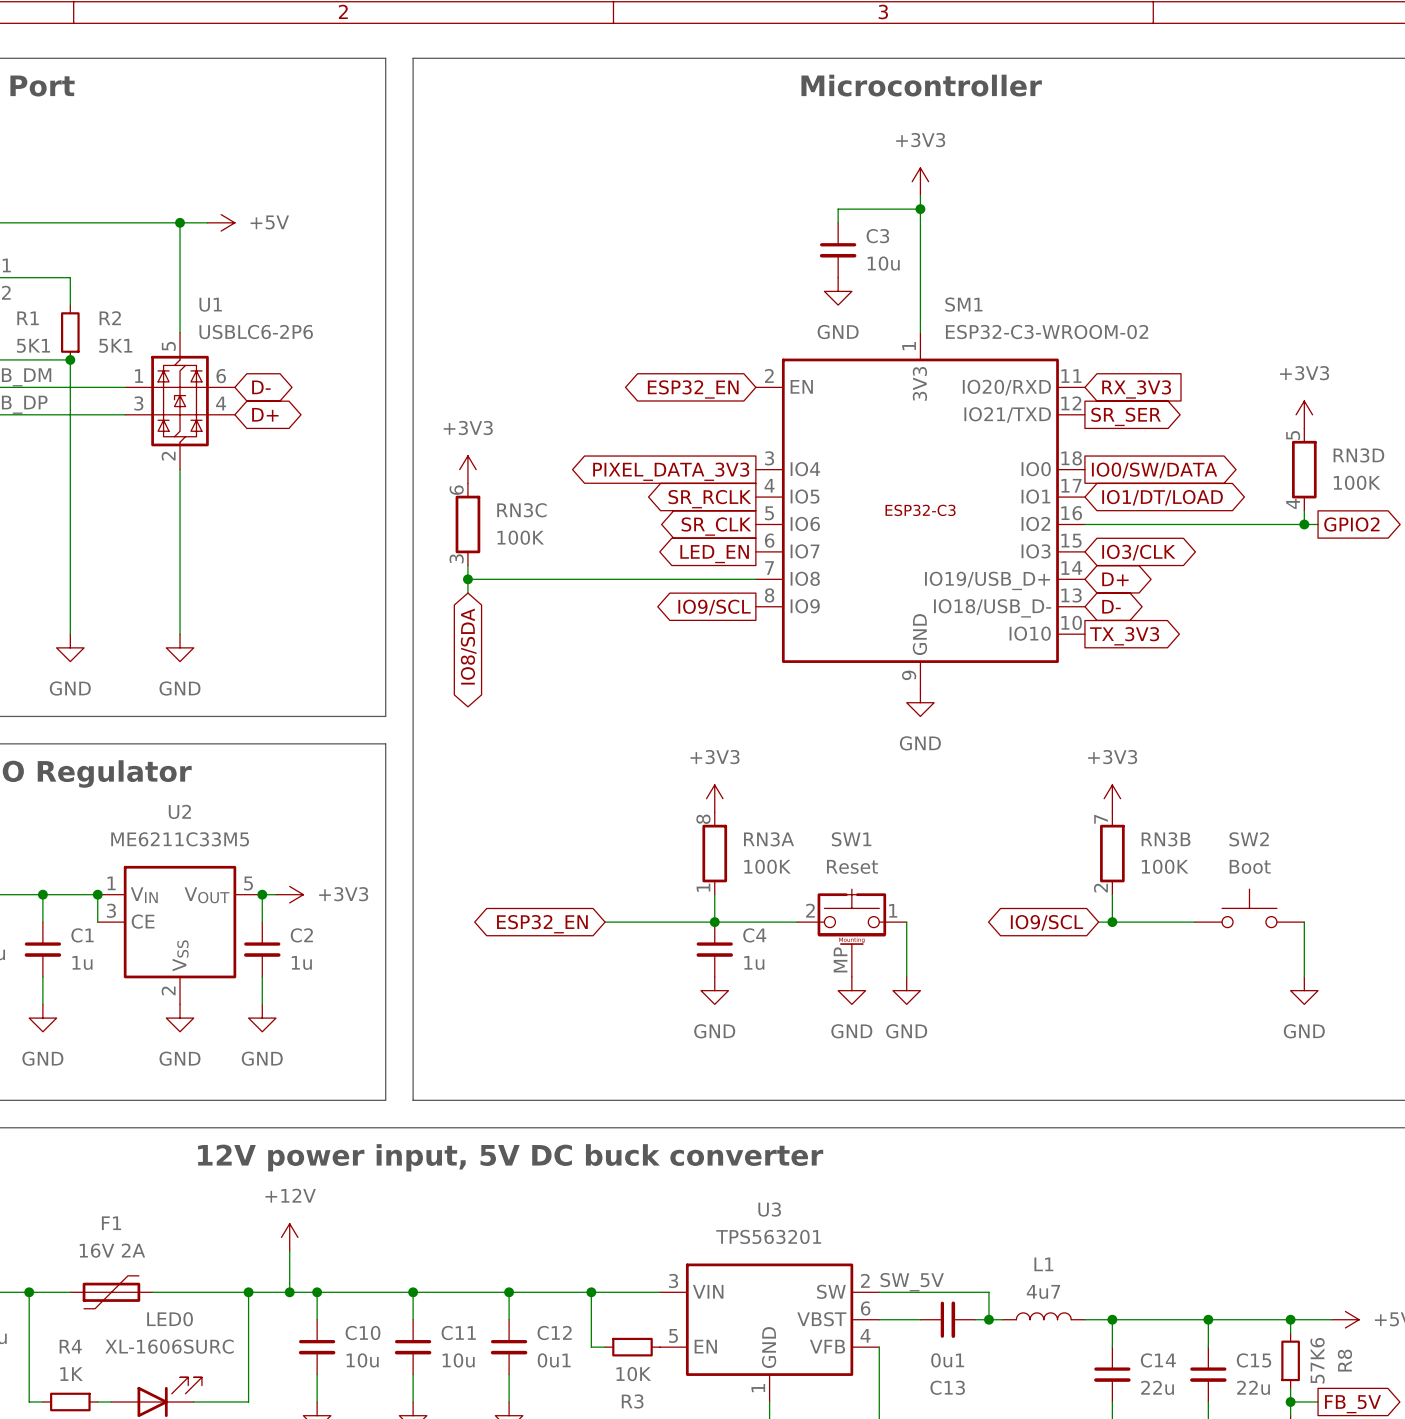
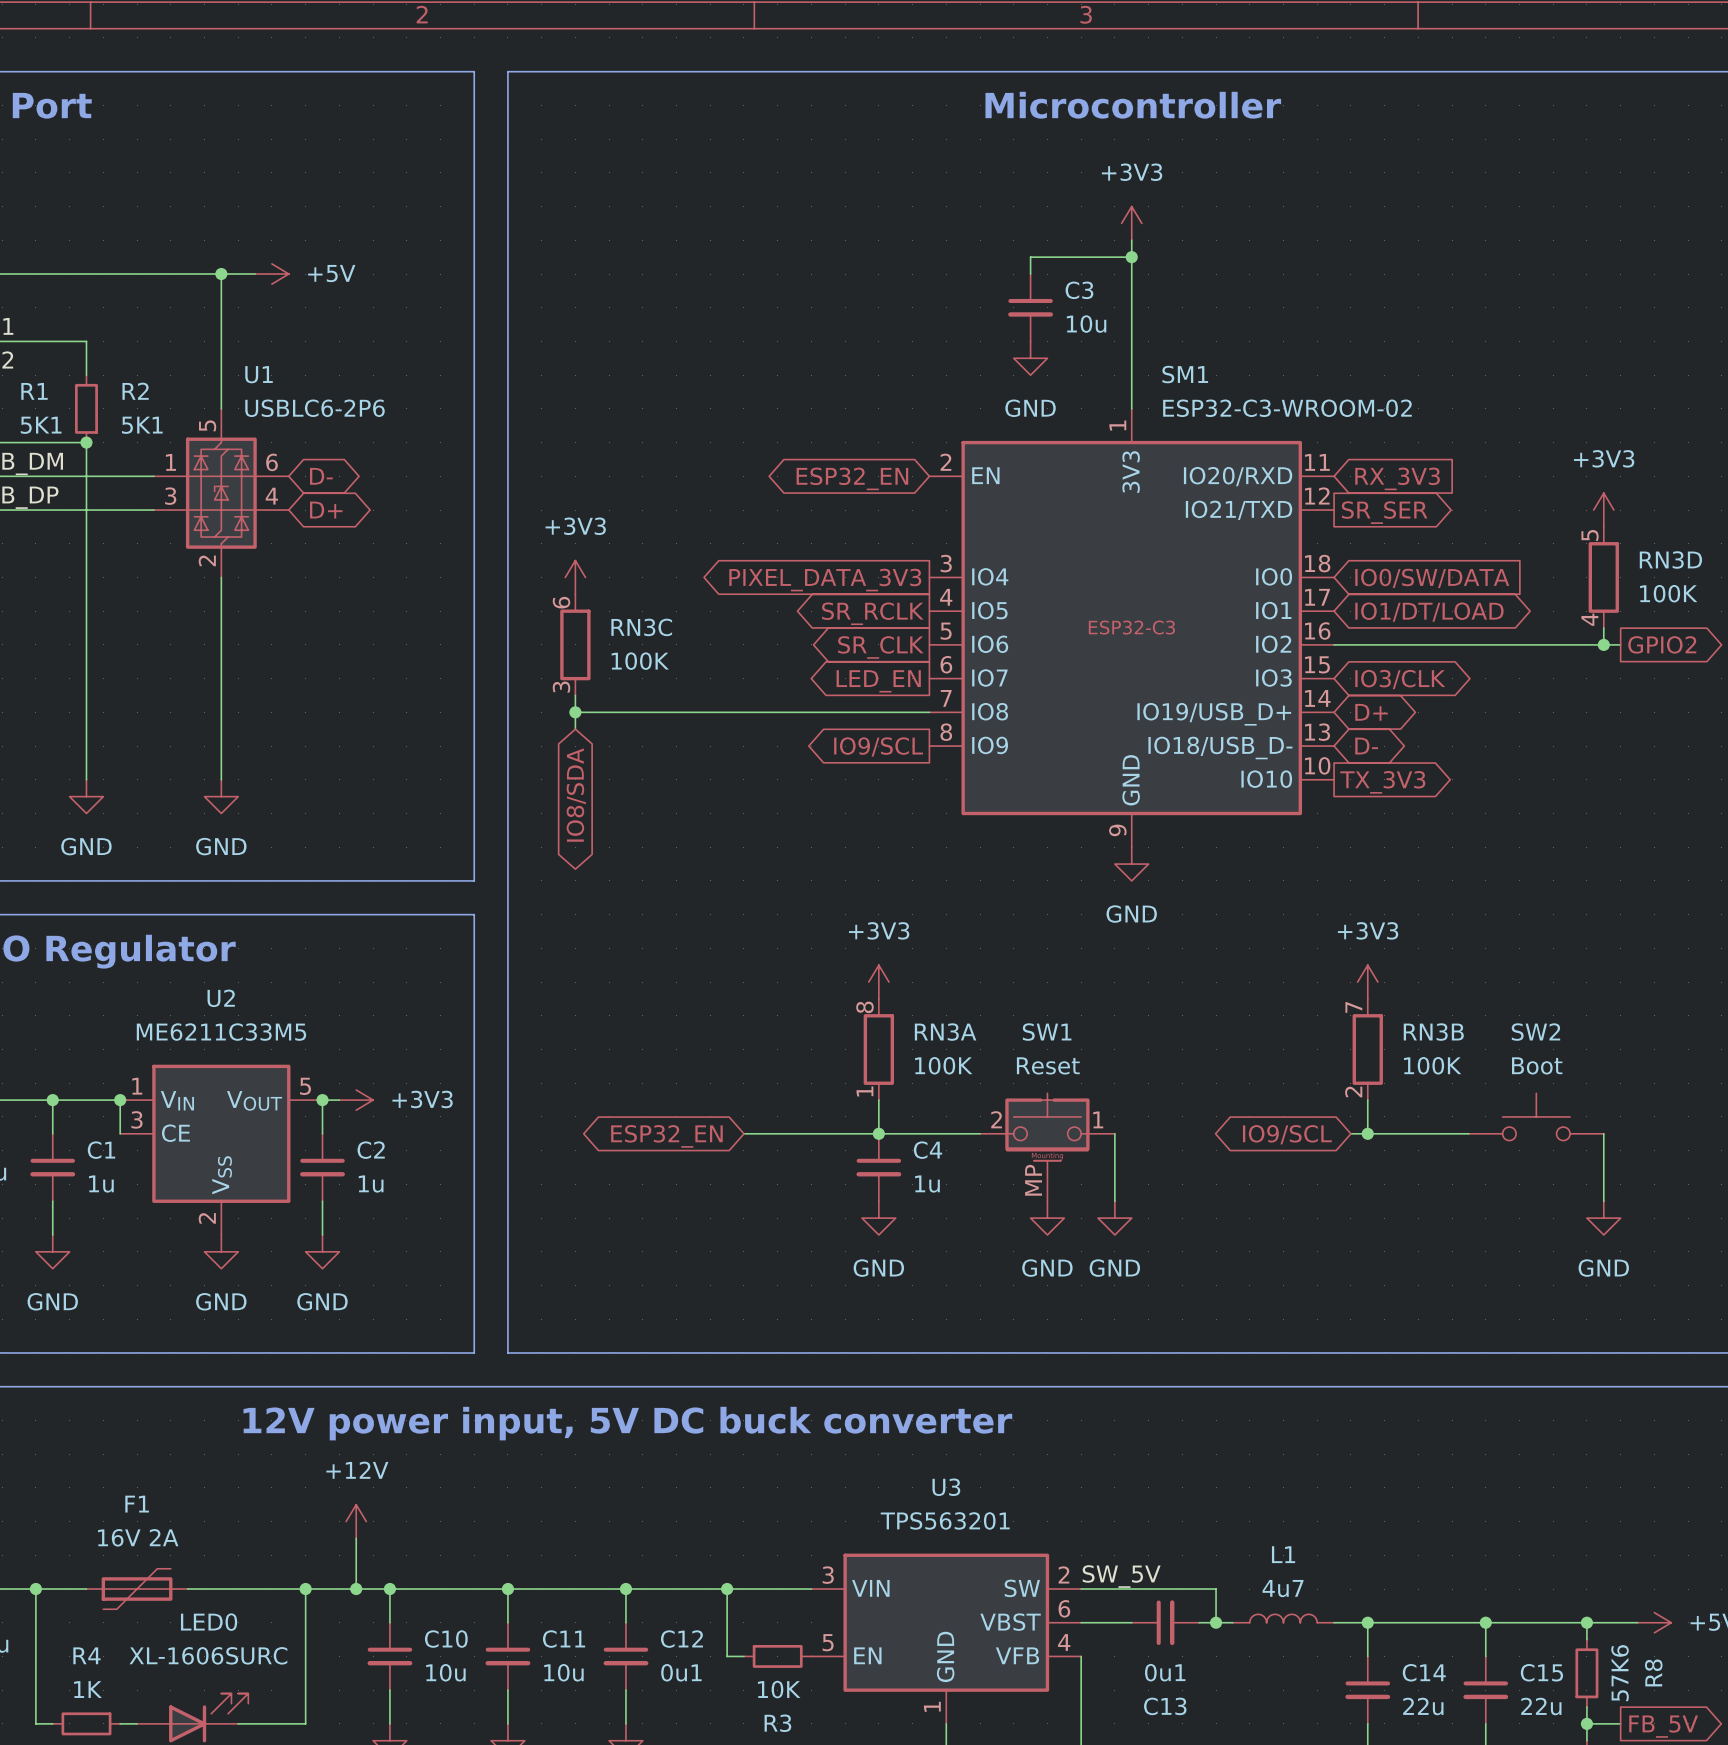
global label shape: output (1154, 470) -> input (1432, 578)

